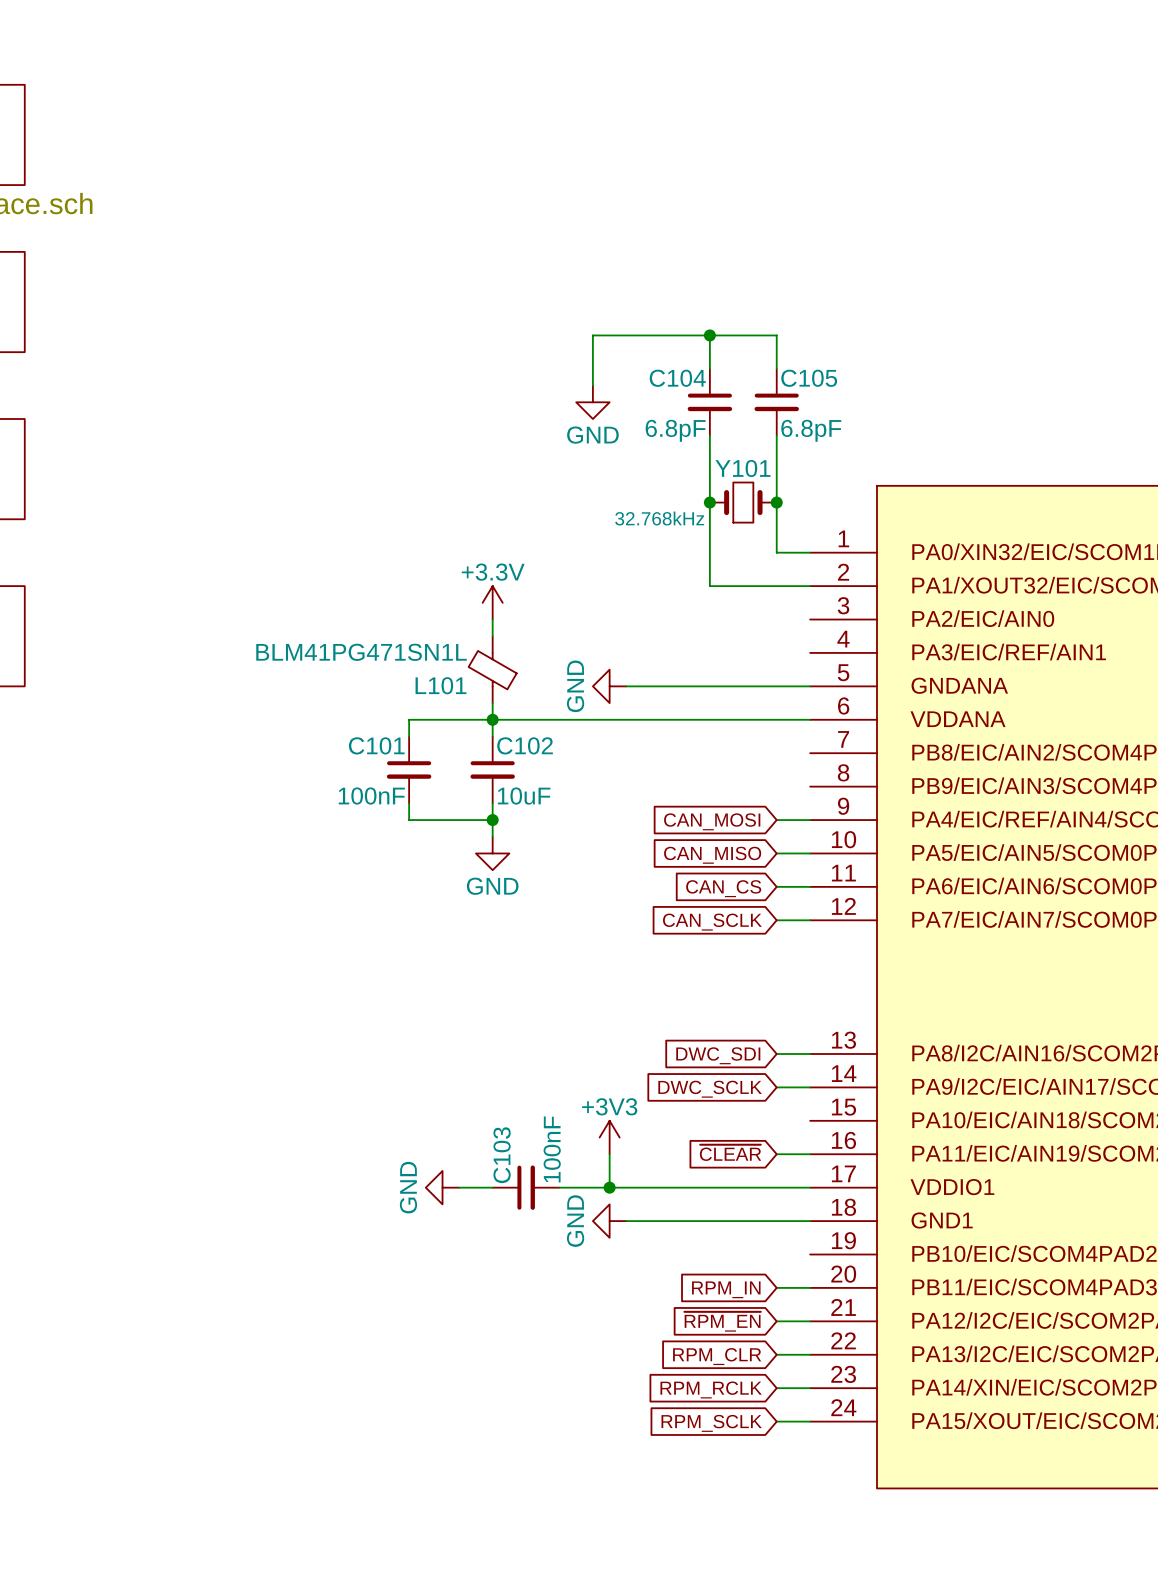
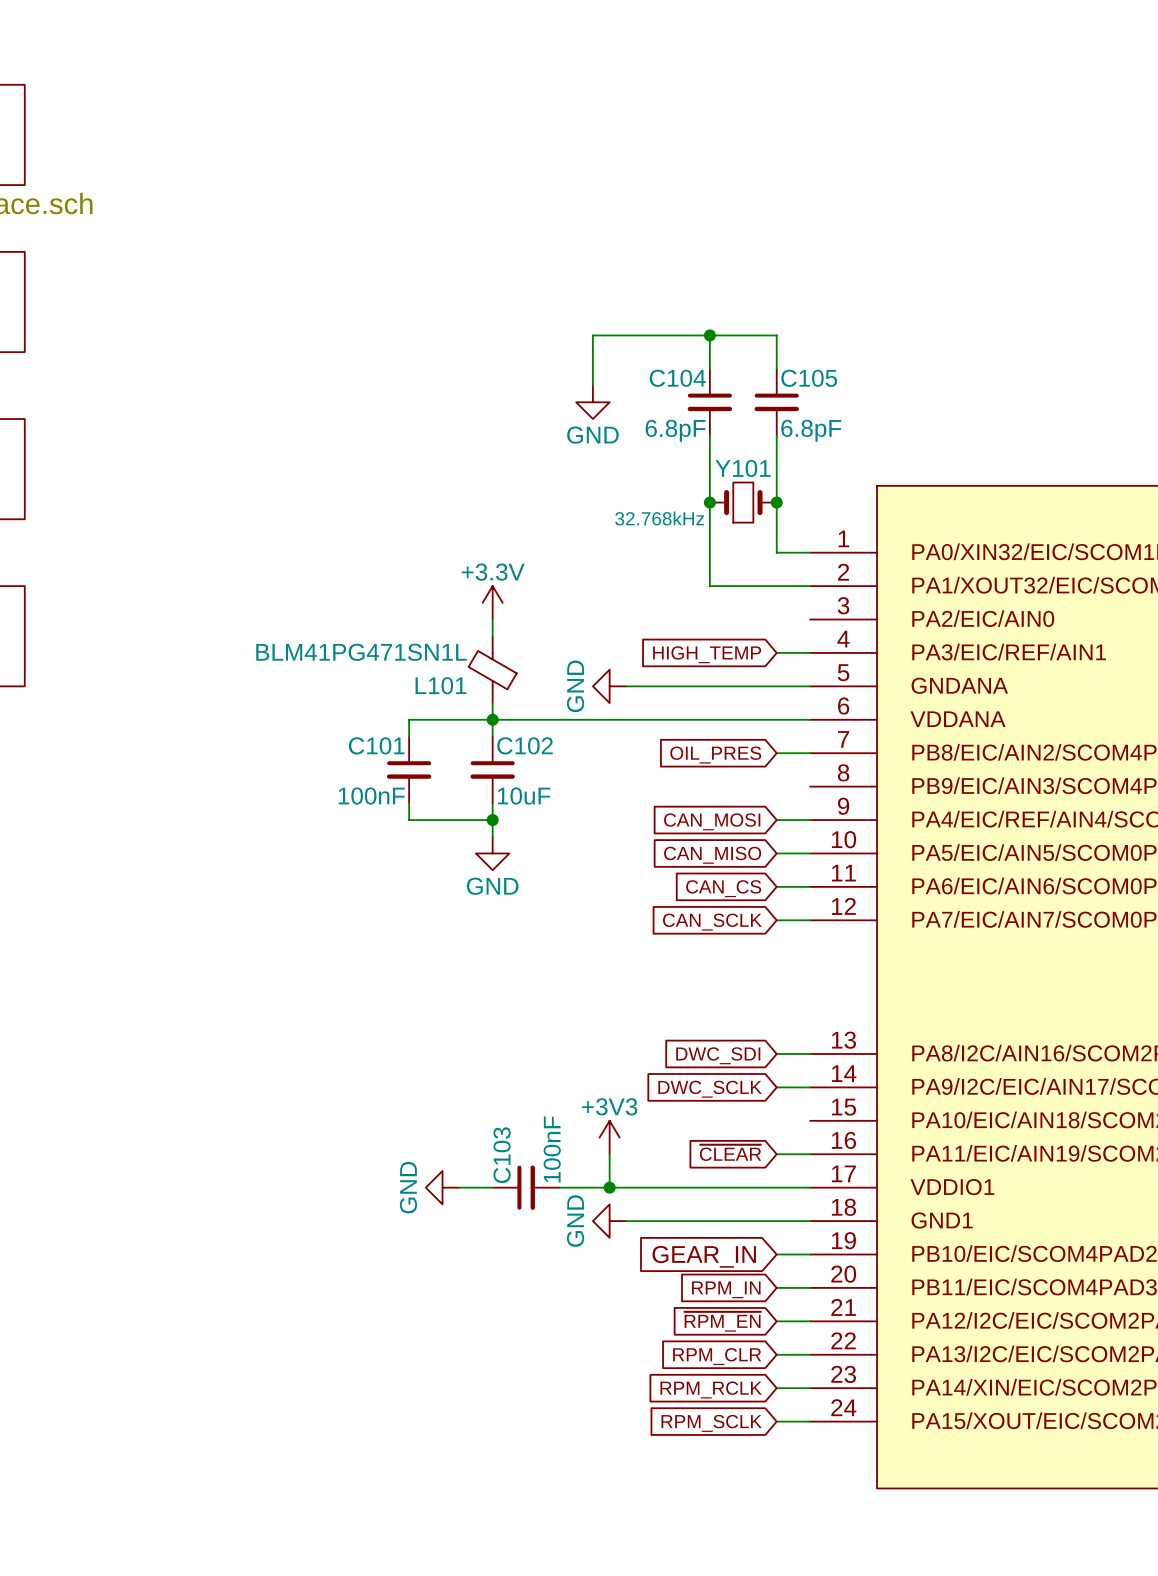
wire: none -> (776, 652) (810, 652)
global label: none -> HIGH_TEMP (707, 654)
wire: none -> (776, 753) (810, 753)
global label: none -> OIL_PRES (715, 754)
wire: none -> (776, 1254) (810, 1254)
global label: none -> GEAR_IN (704, 1256)

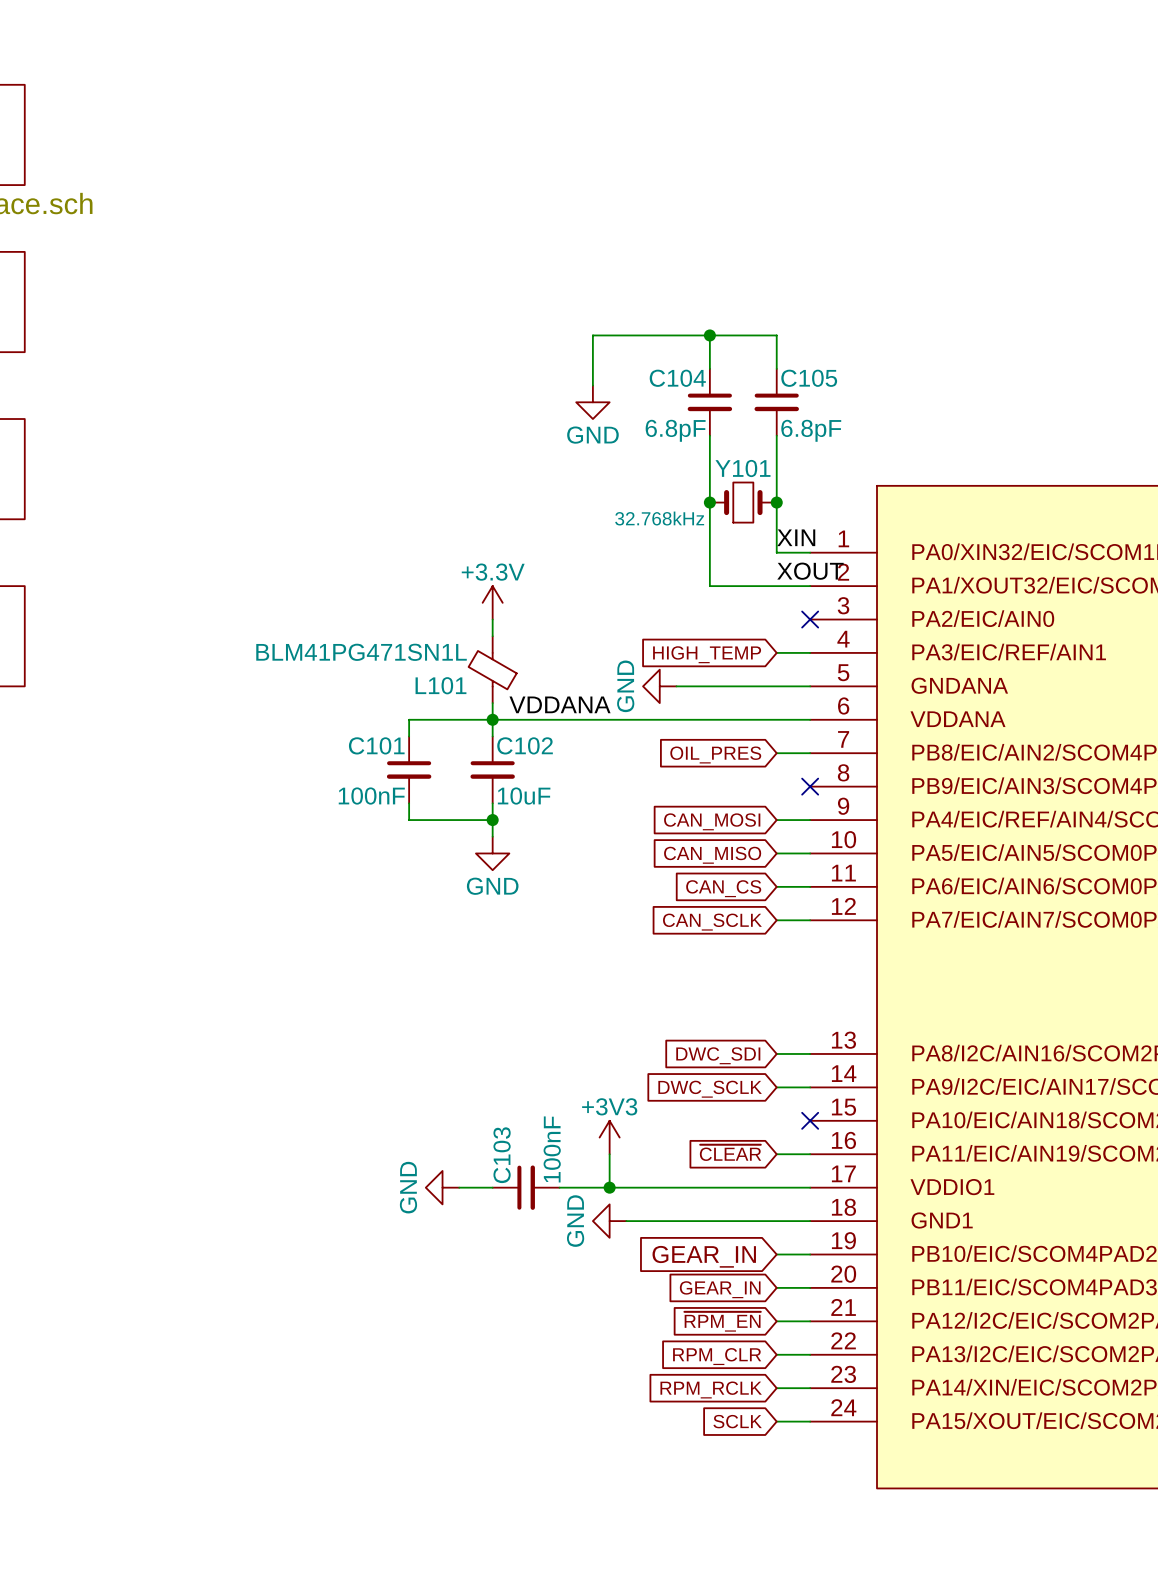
label: none -> XIN (796, 537)
label: none -> XOUT (810, 571)
no-connect mark: none -> (810, 619)
power symbol position: GND (609, 686) -> GND (659, 686)
wire: (626, 686) (676, 686) -> none
label: none -> VDDANA (560, 704)
no-connect mark: none -> (810, 786)
no-connect mark: none -> (810, 1120)
global label: RPM_IN (726, 1289) -> GEAR_IN (720, 1289)
global label: RPM_SCLK (711, 1423) -> SCLK (737, 1421)

